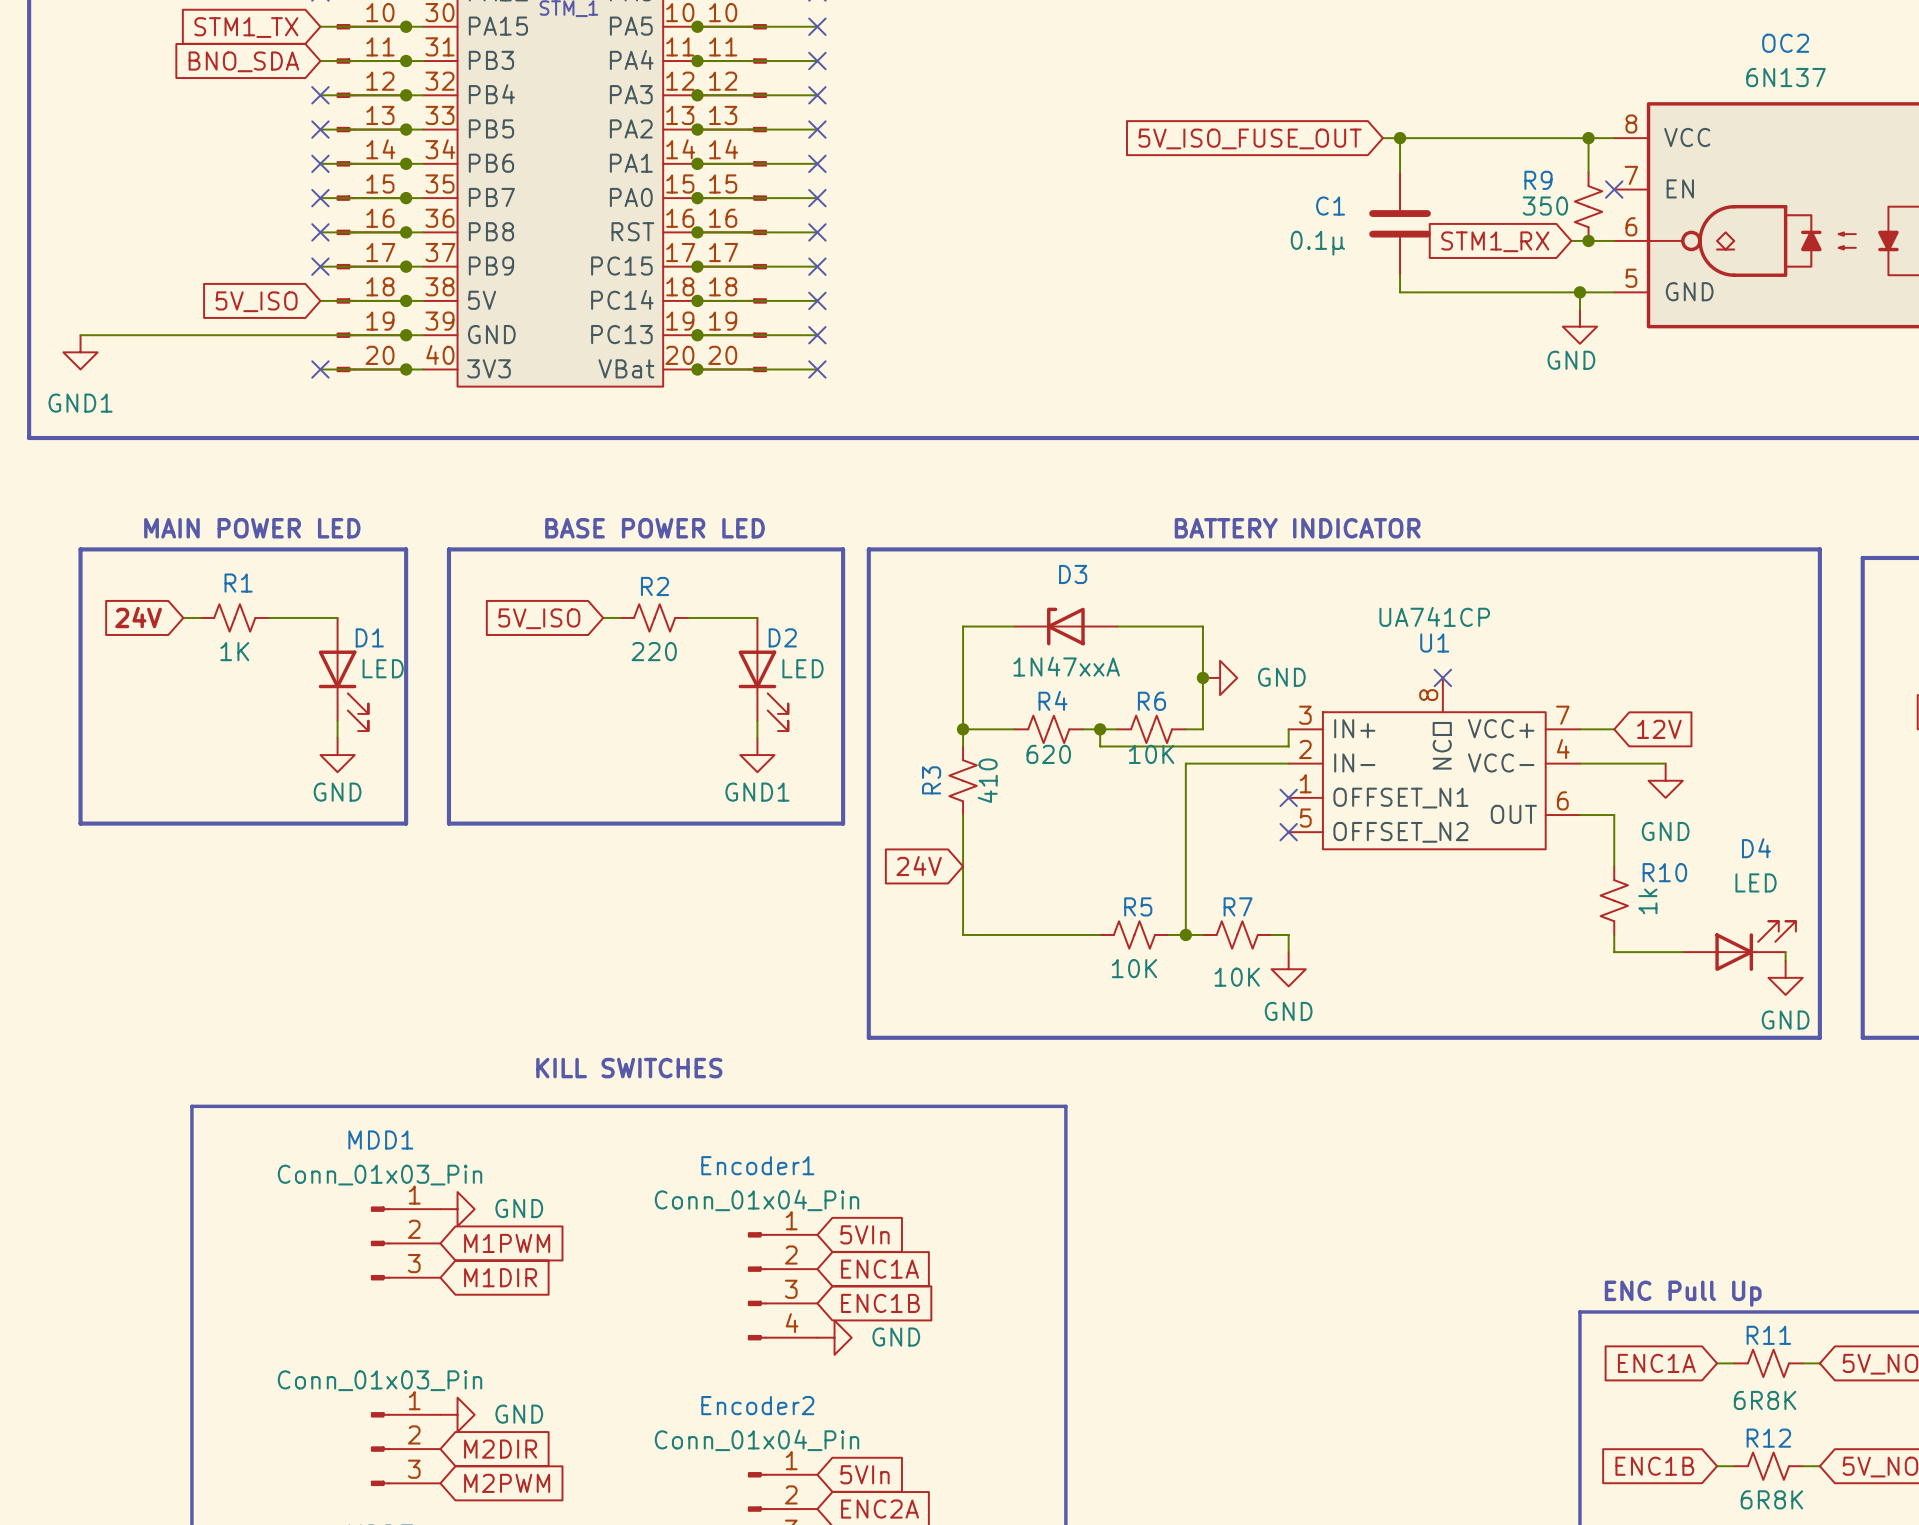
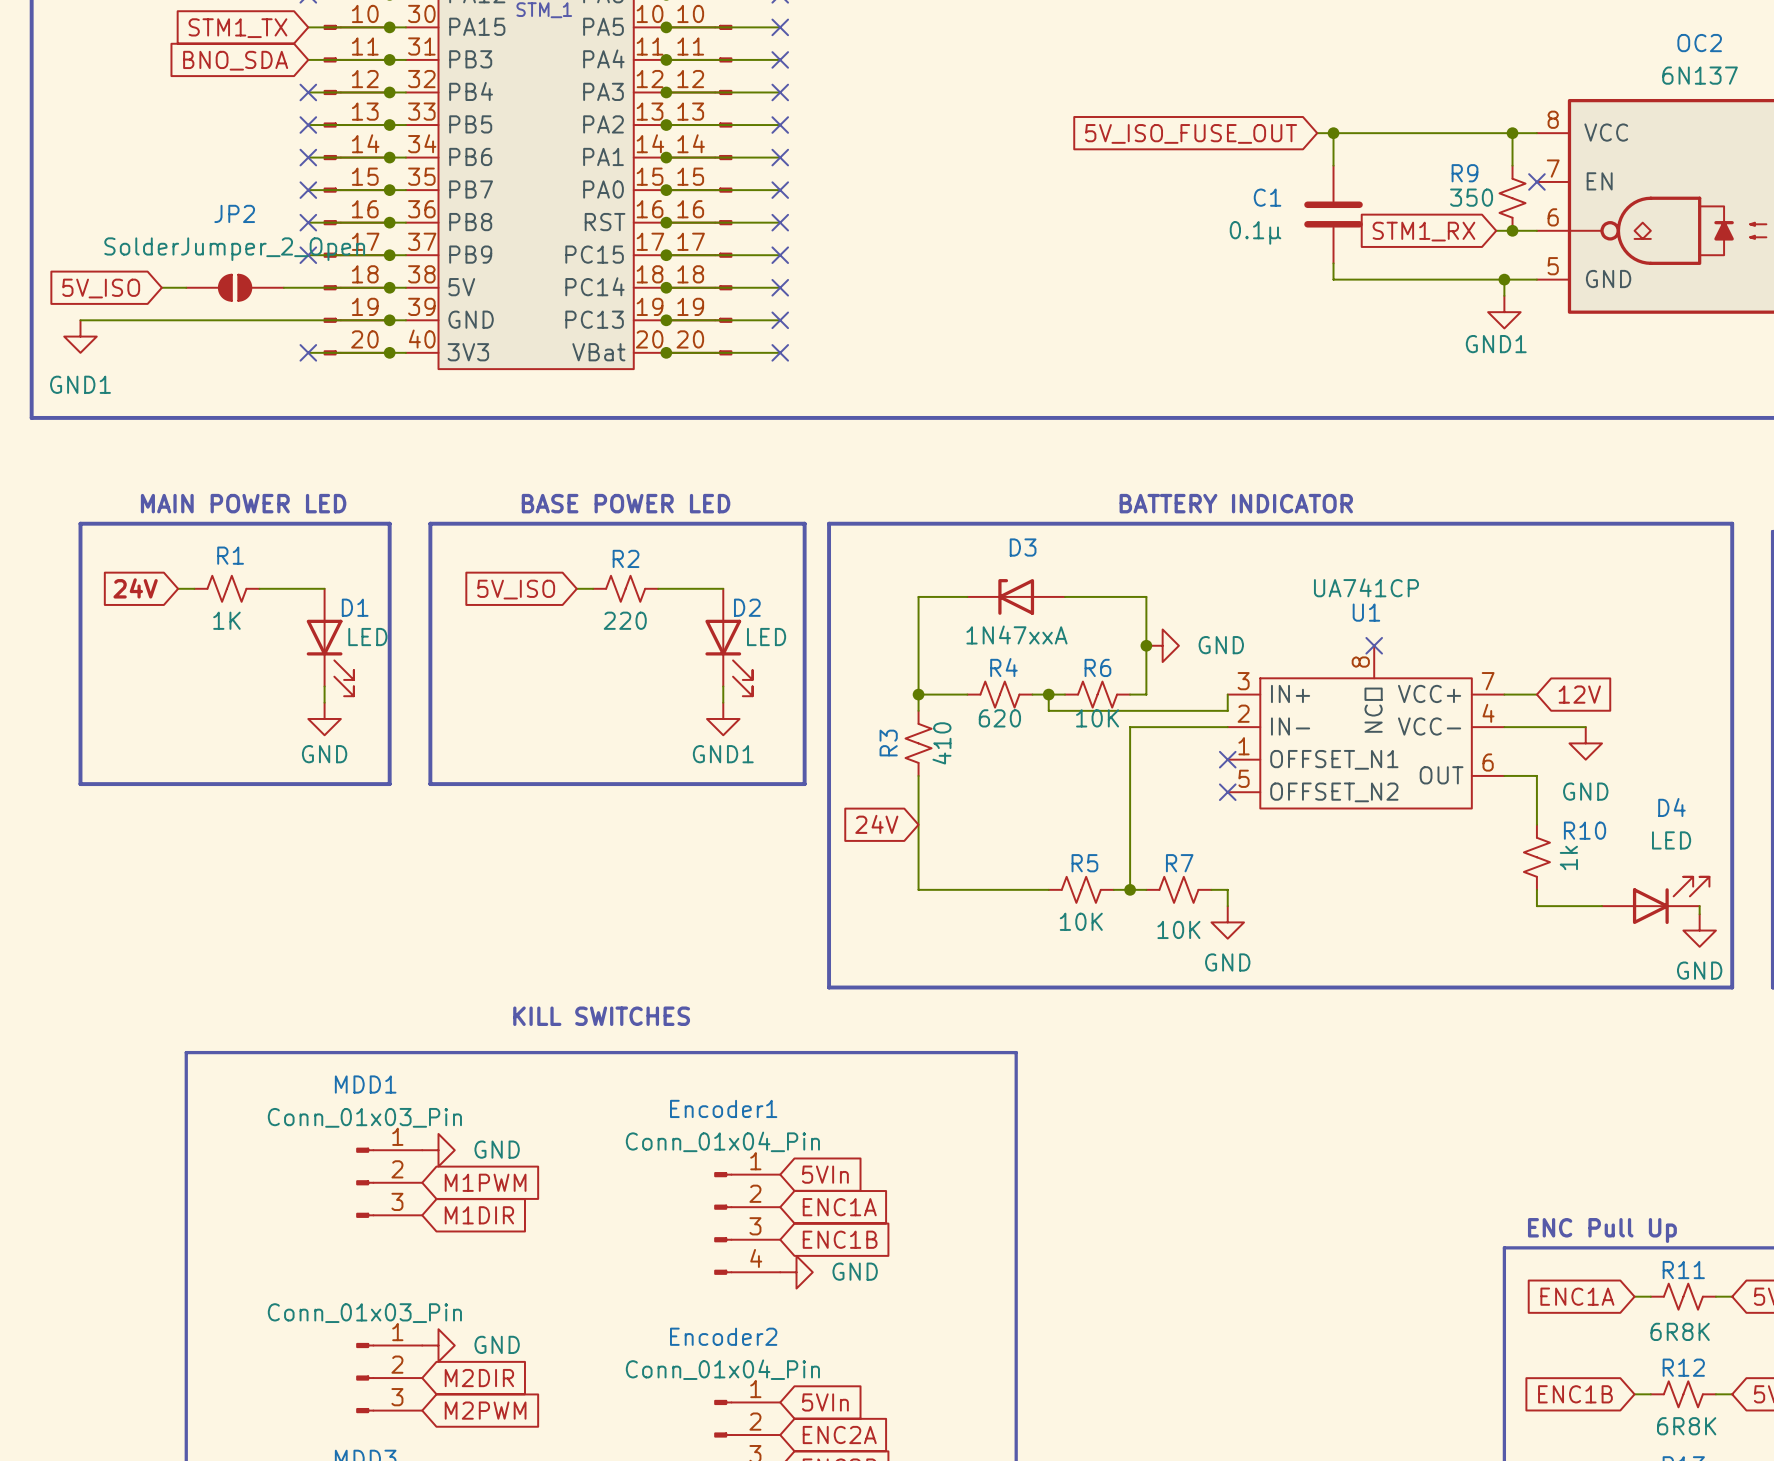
wire: none -> (161, 287) (186, 287)
JP2: none -> SolderJumper_2_Open (235, 287)
wire: none -> (283, 287) (308, 287)
global label position: 5V_ISO (256, 301) -> 5V_ISO (101, 288)
power symbol: GND (1579, 326) -> GND1 (1504, 312)

